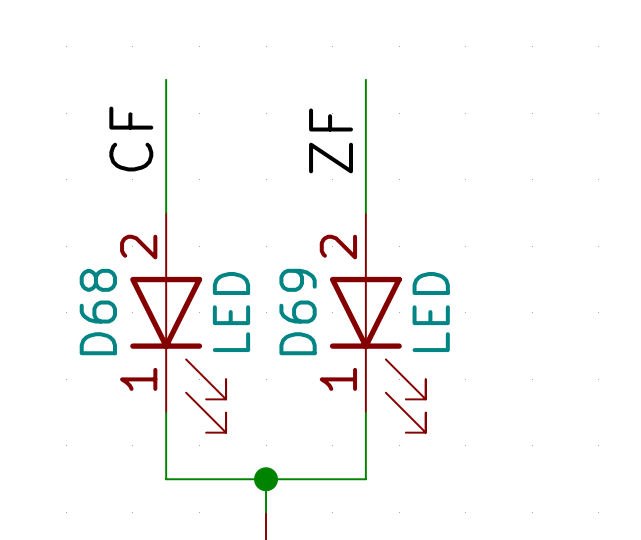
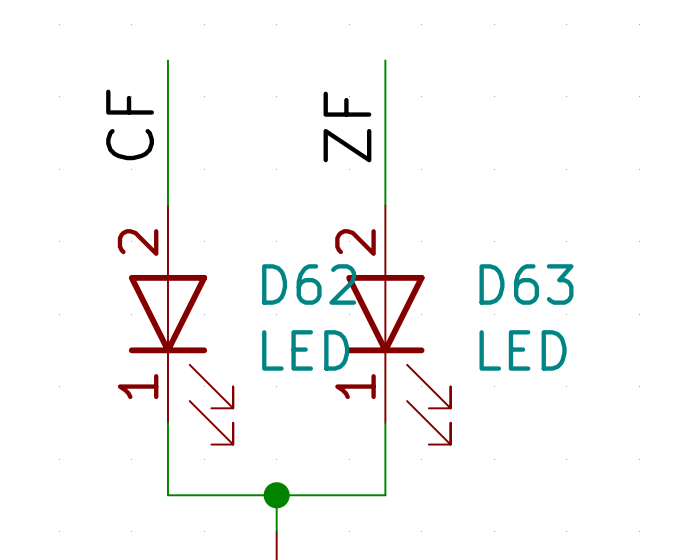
D68 name: D68 (98, 312) -> D62 (309, 284)
D68 value rotation: 0° (231, 312) -> 90° clockwise (305, 350)
D69 name: D69 (298, 312) -> D63 (526, 284)
D69 value rotation: 0° (431, 312) -> 90° clockwise (523, 350)

